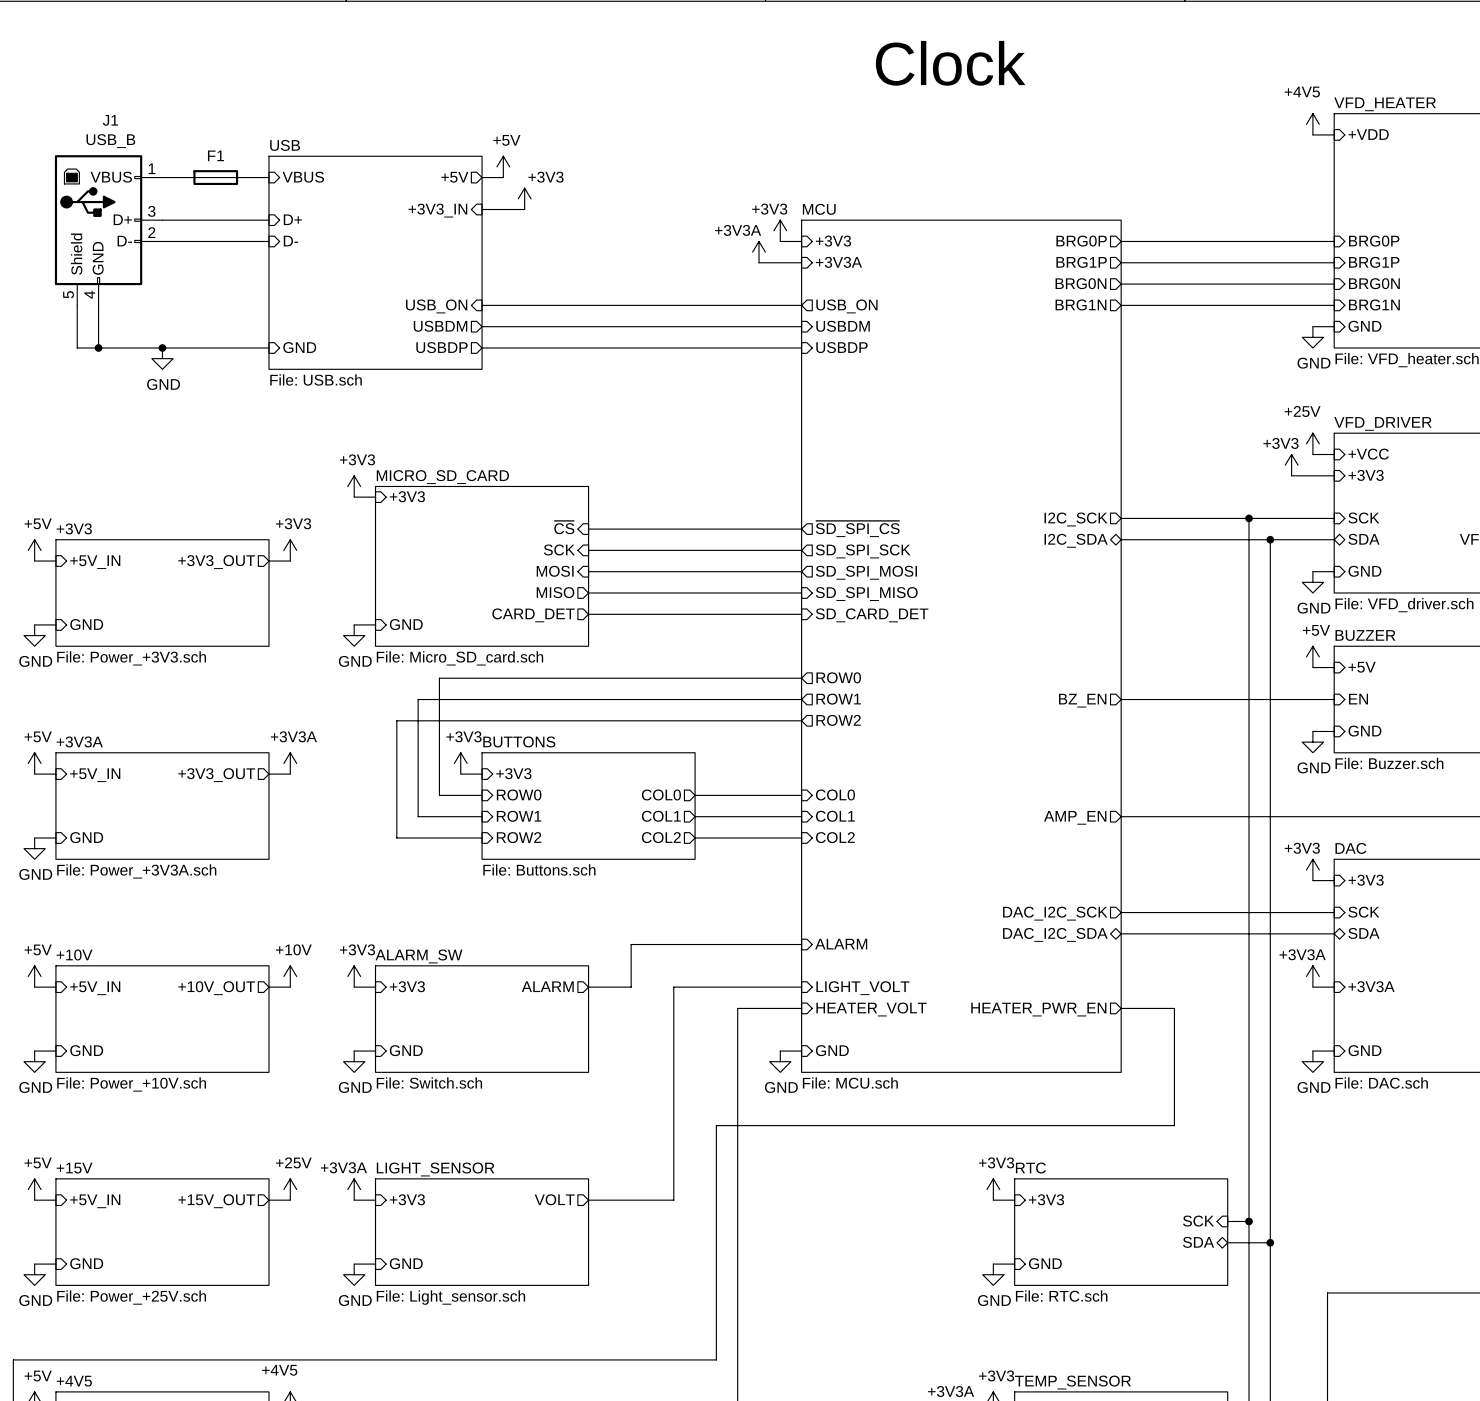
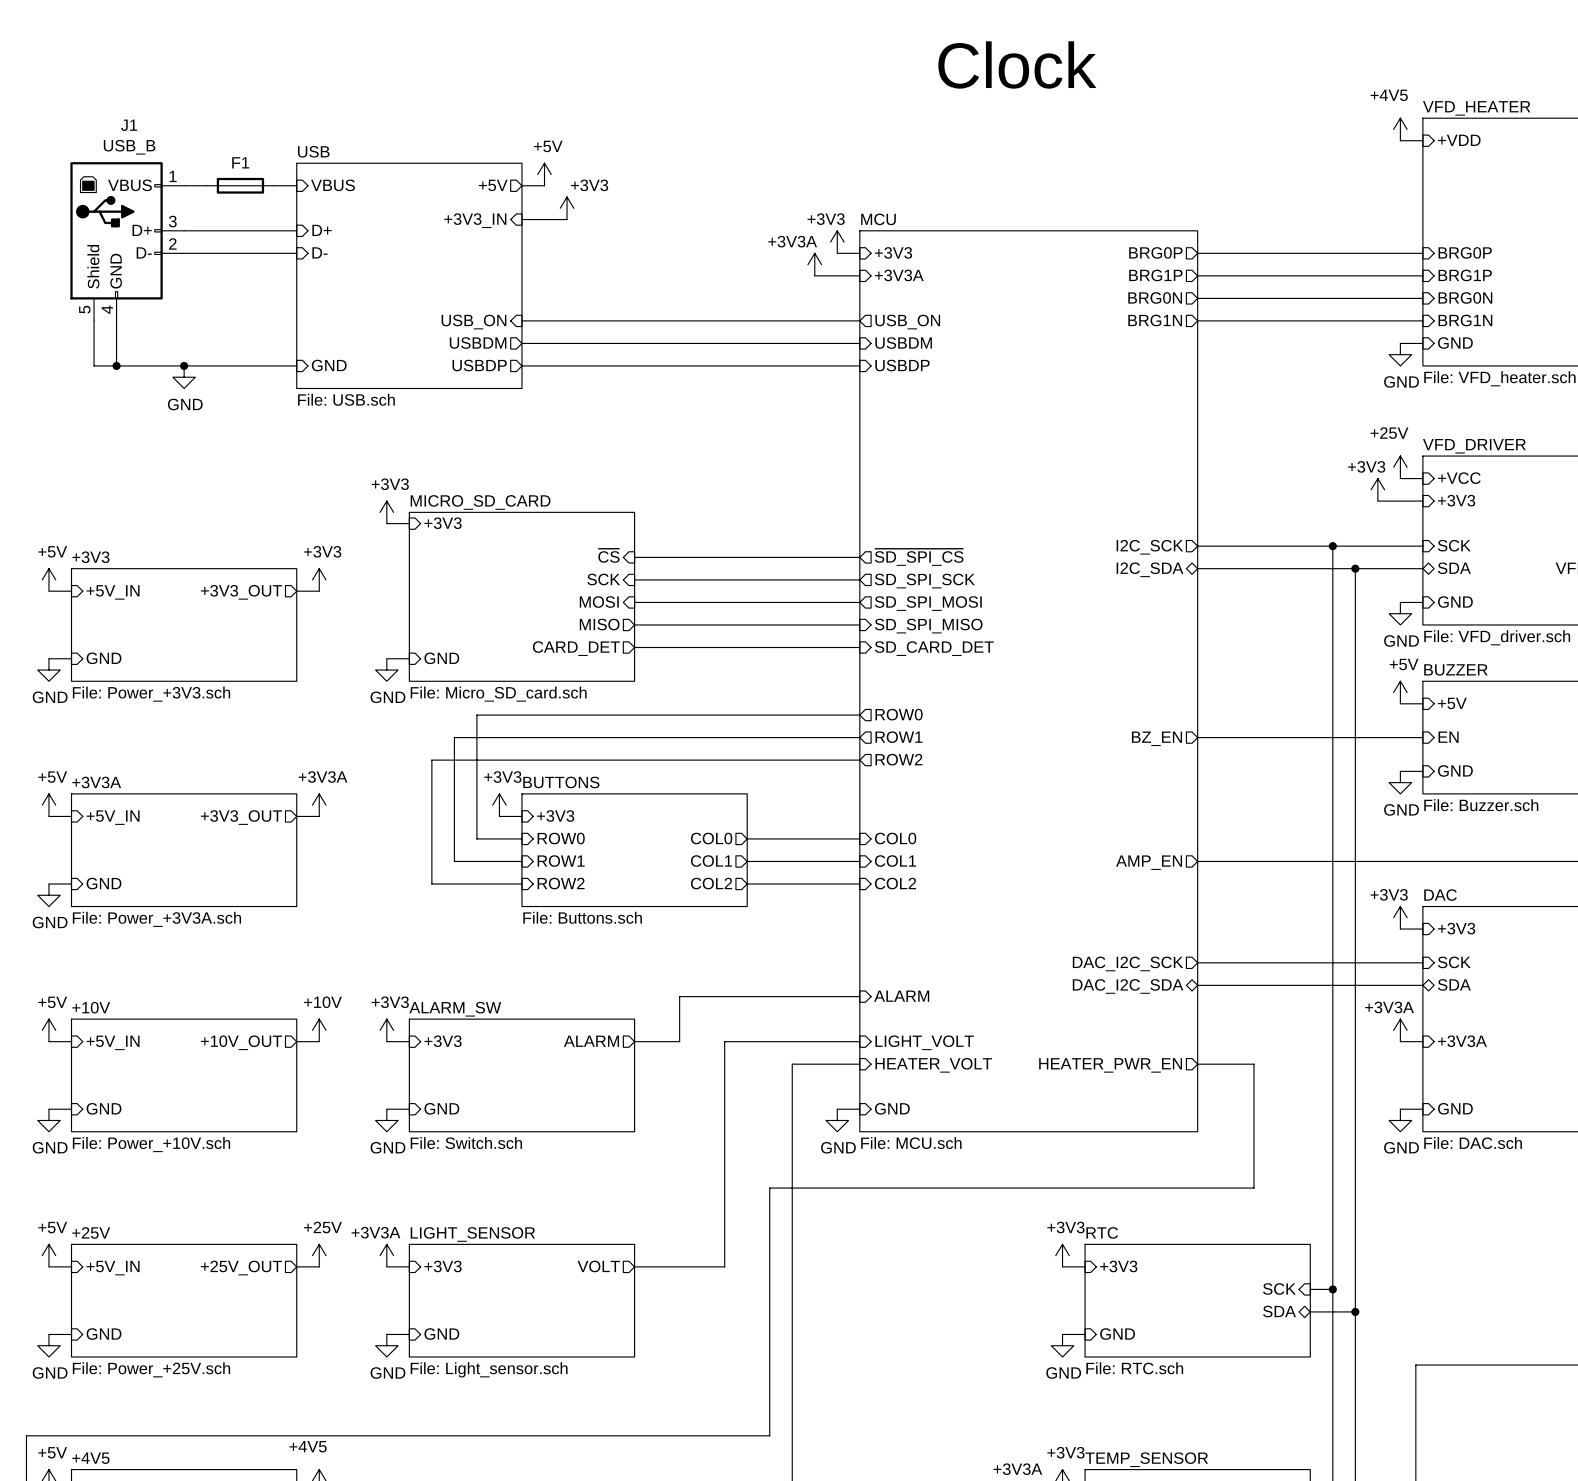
sheet +15V name: +15V (74, 1168) -> +25V (91, 1232)
sheet pin: +15V_OUT (216, 1201) -> +25V_OUT (241, 1268)

